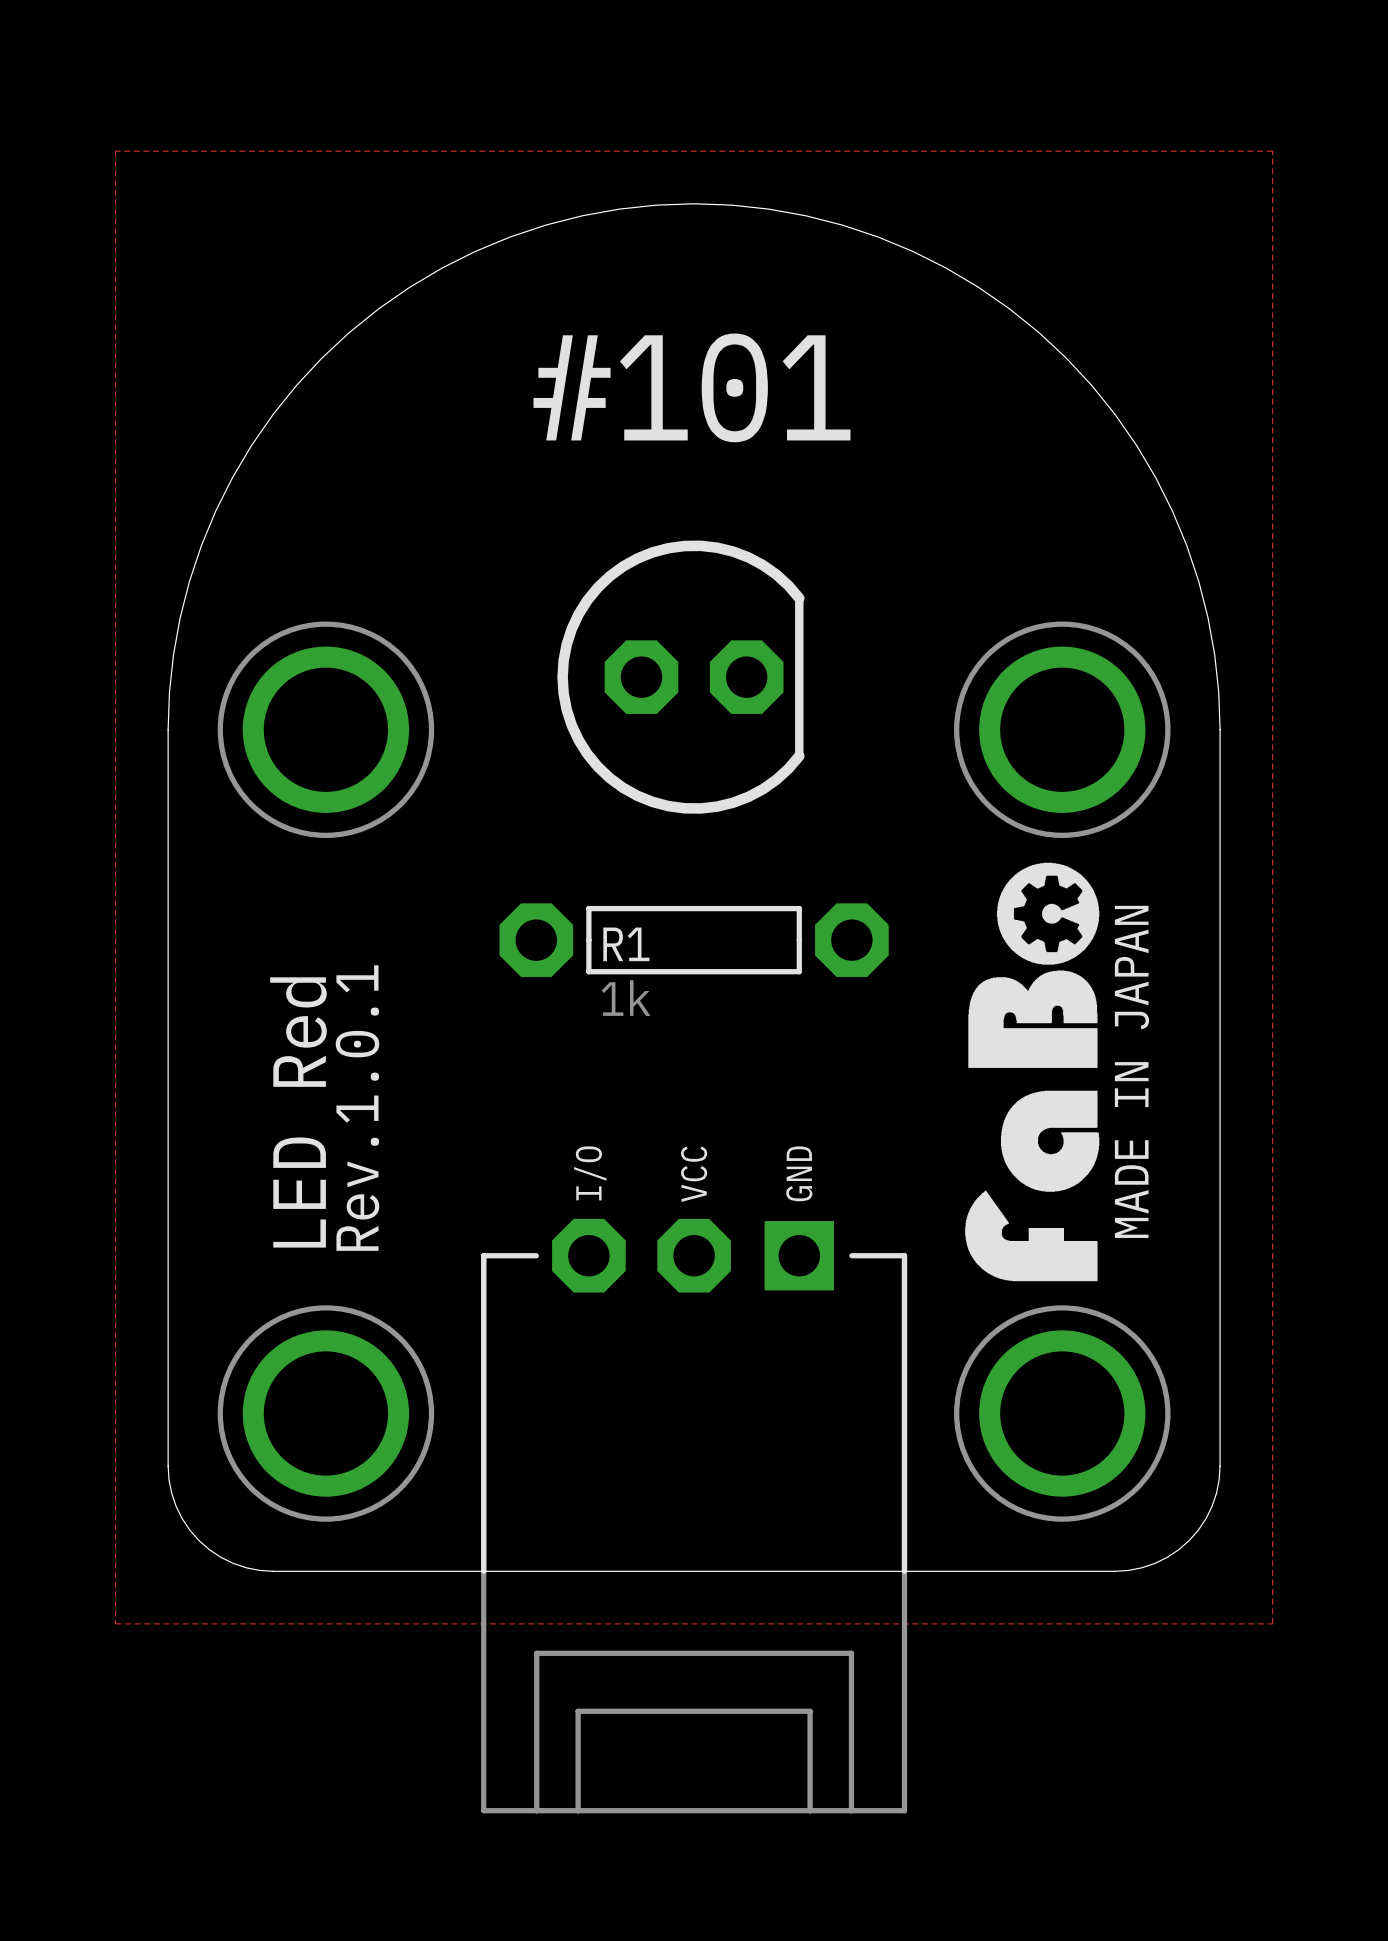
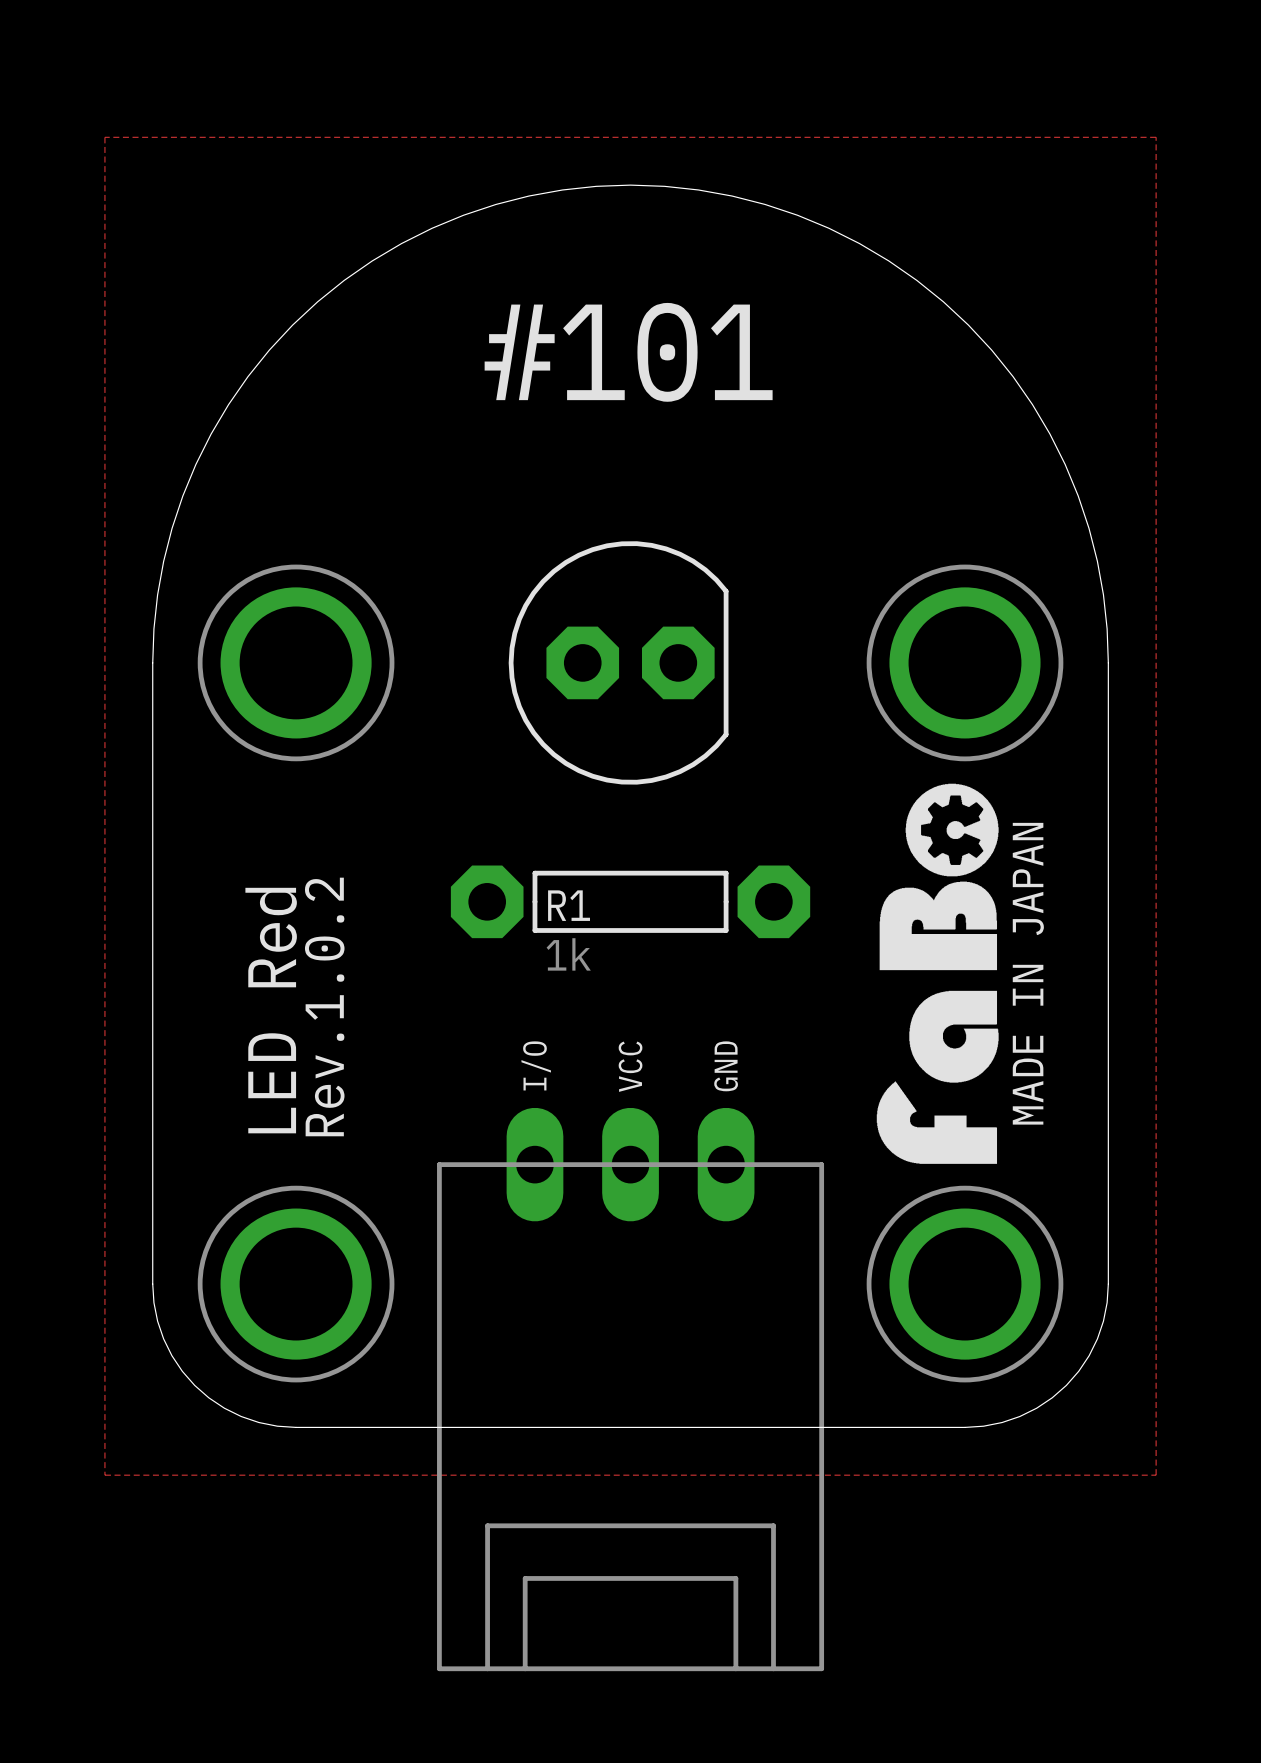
part footprint: [168, 203, 1221, 1814] -> [152, 185, 1109, 1672]
part: (680, 677) -> none
part: none -> (618, 662)
R1 footprint: [499, 903, 889, 977] -> [450, 865, 811, 939]
text: Rev.1.0.1 (357, 1108) -> Rev.1.0.2 (324, 1006)

